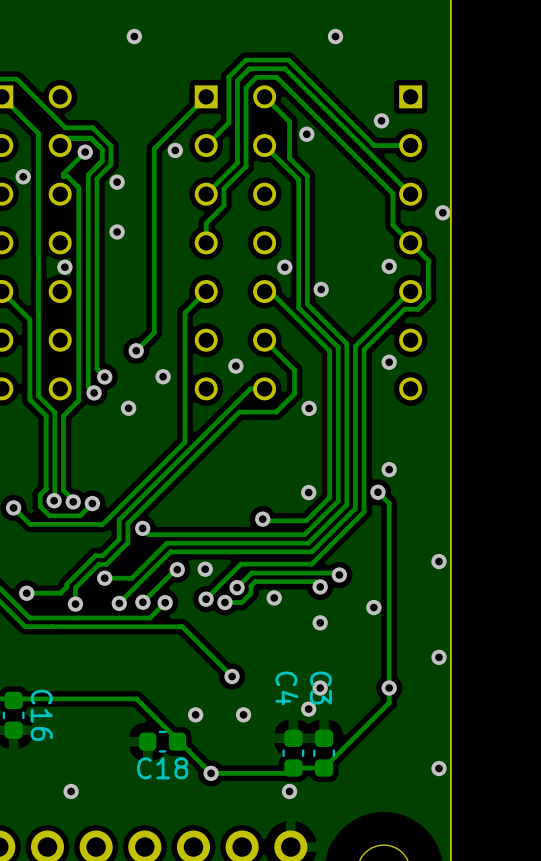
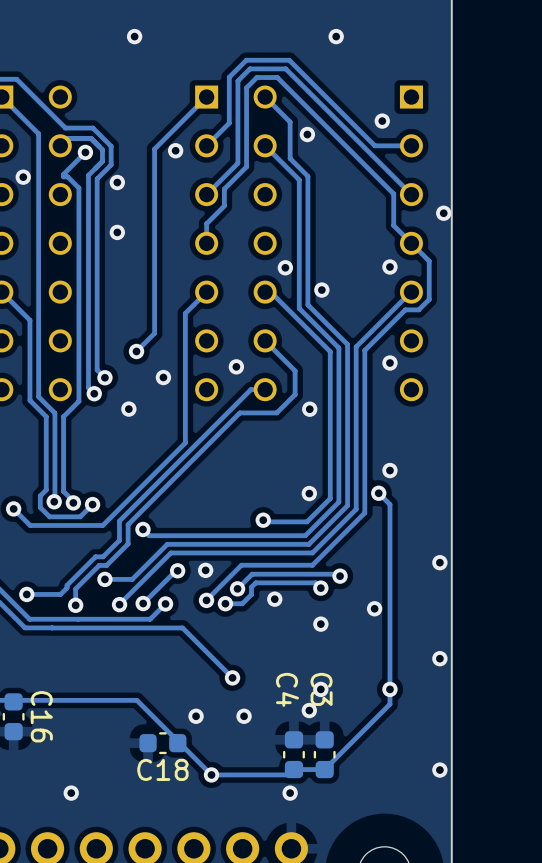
via: (64, 267) -> none

